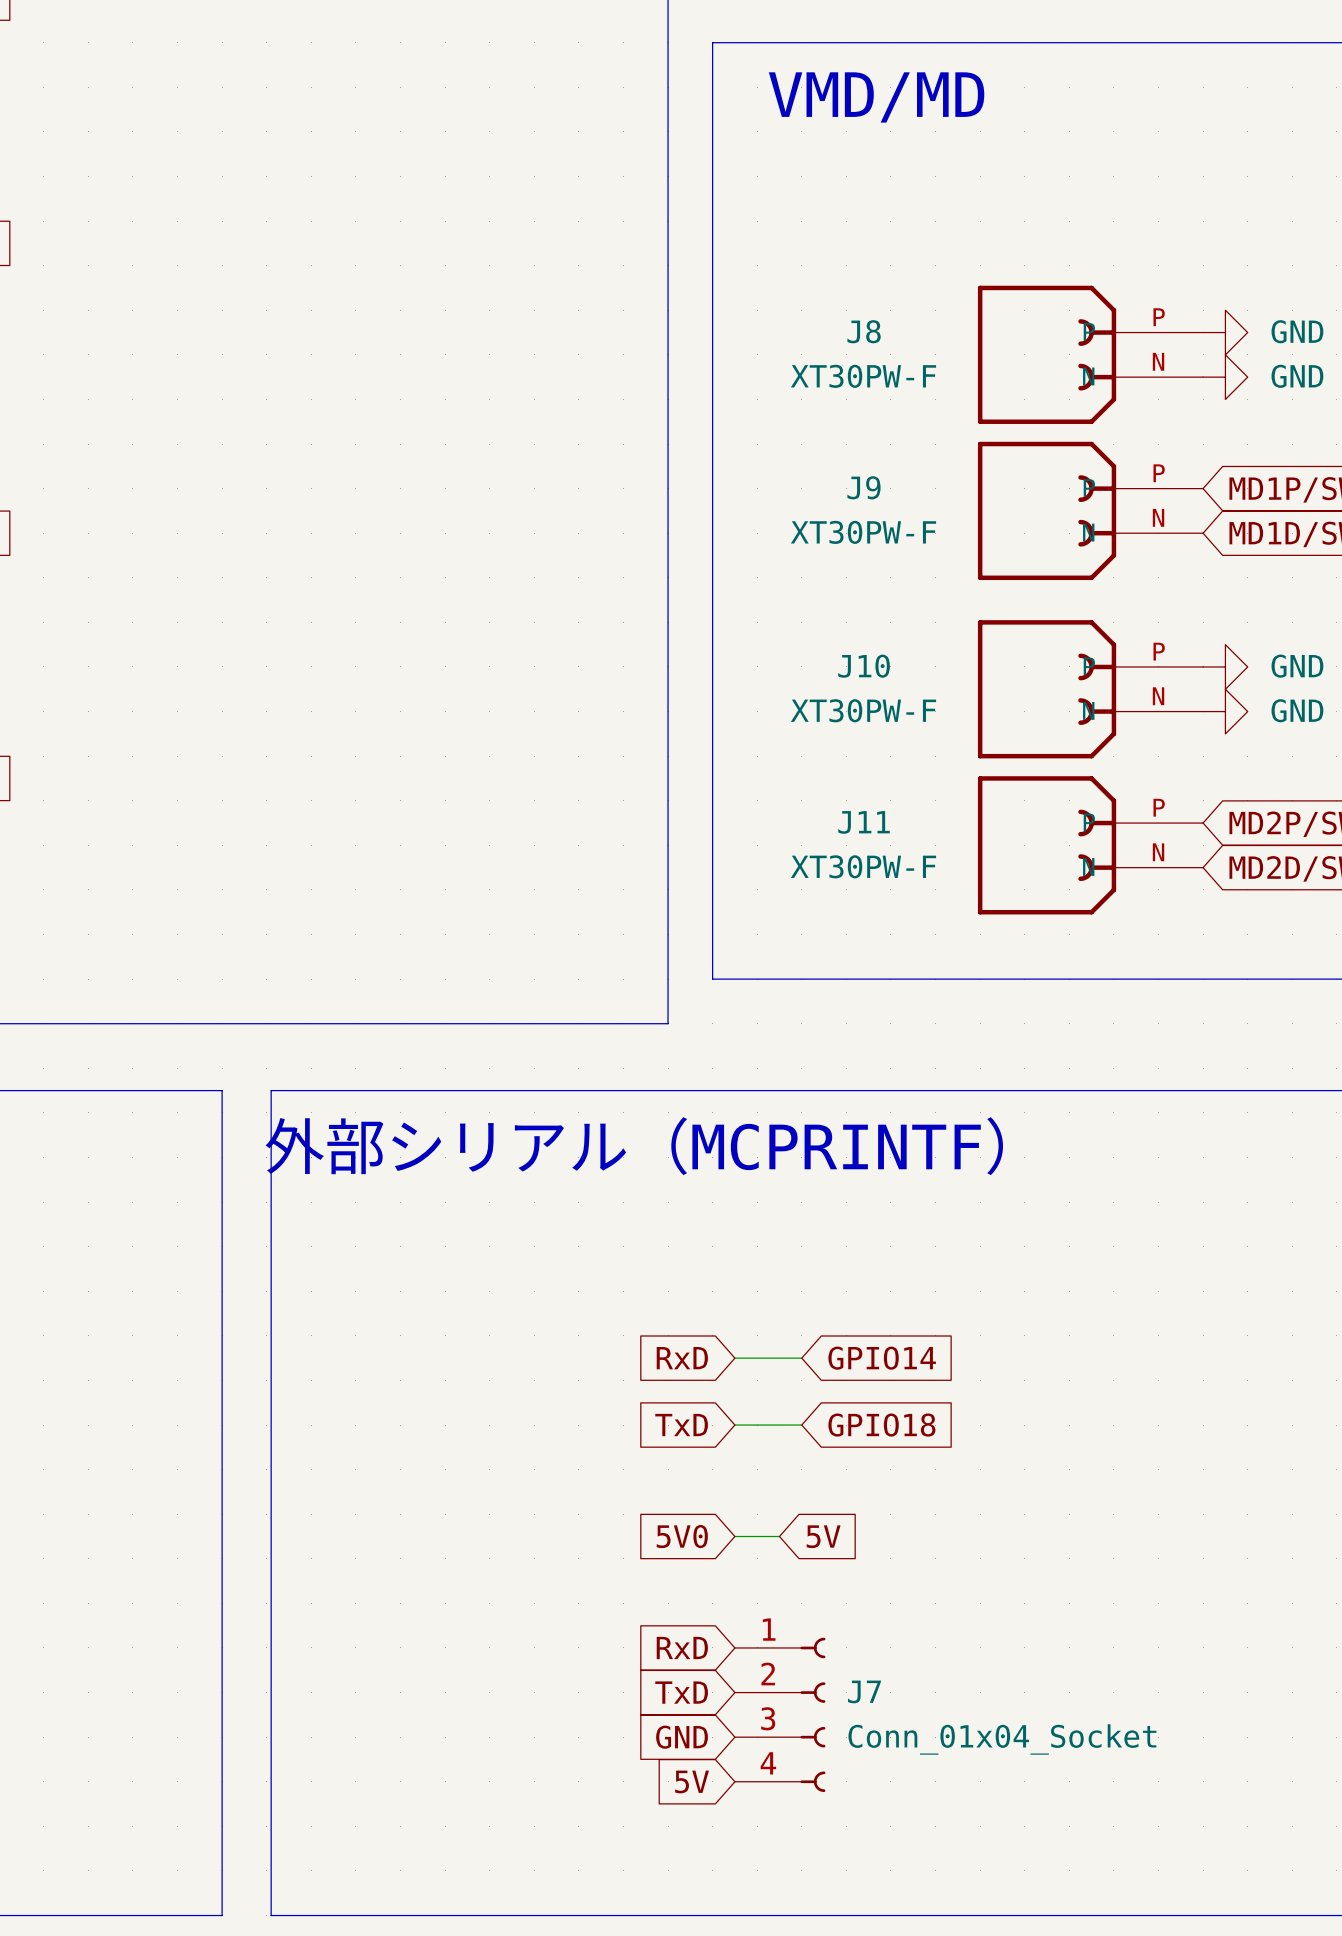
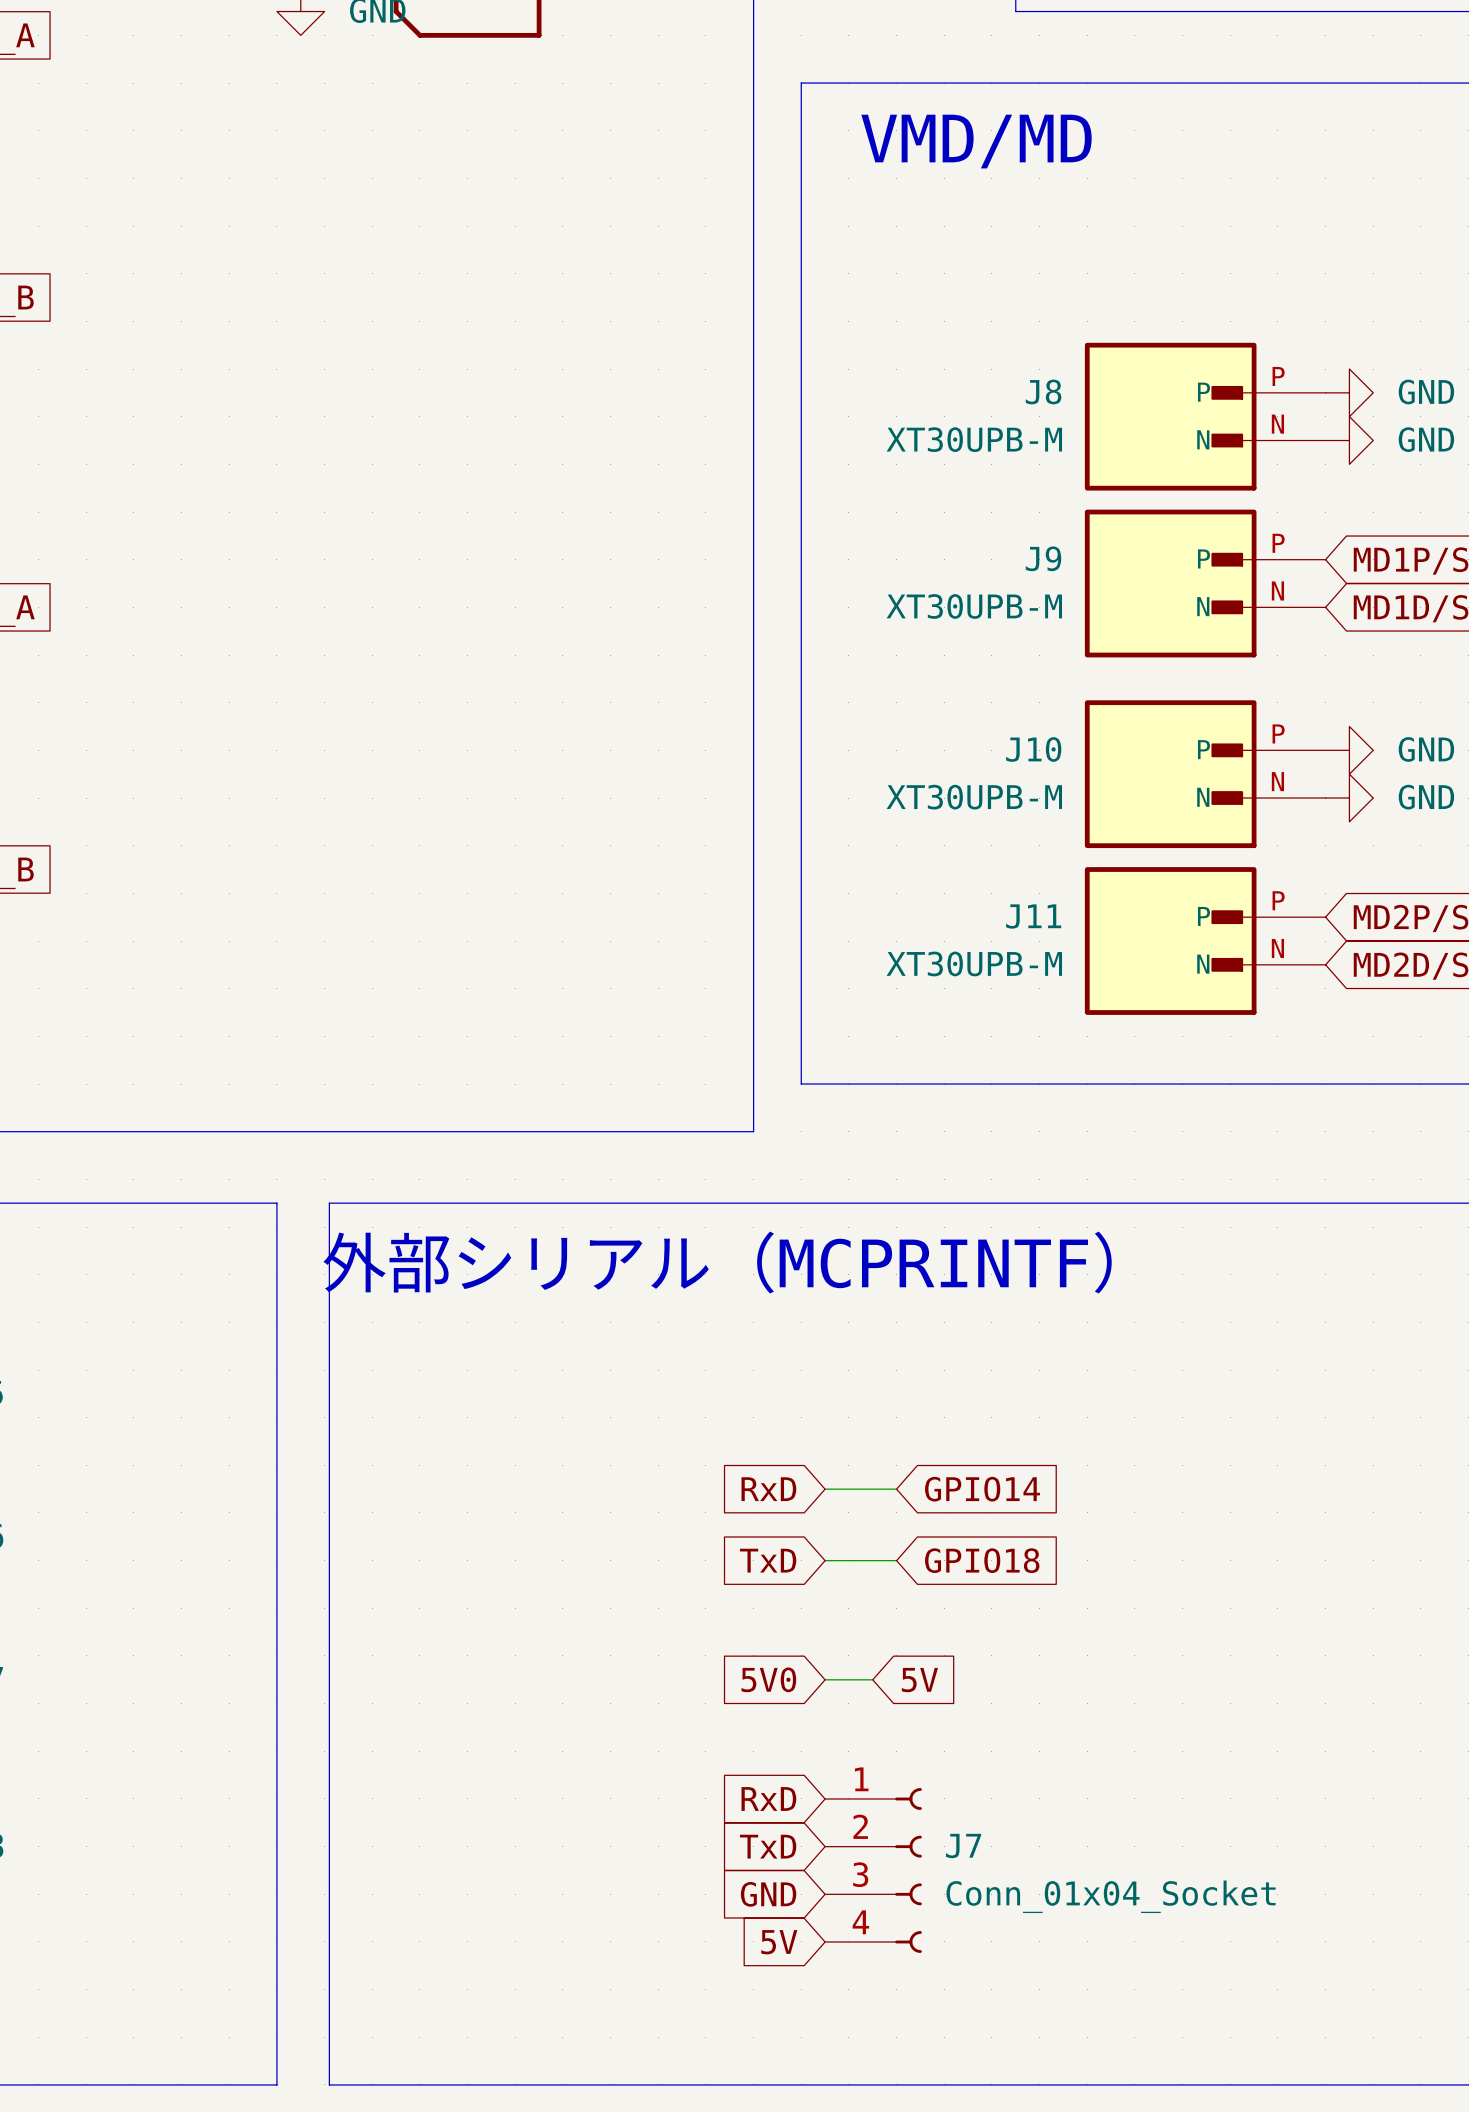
J8 symbol: [977, 285, 1204, 424] -> [1084, 342, 1326, 491]
J8 name position: J8 (864, 331) -> J8 (1043, 391)
J8 value: XT30PW-F (863, 376) -> XT30UPB-M (974, 439)
J9 symbol: [977, 441, 1204, 581] -> [1084, 509, 1326, 658]
J9 name position: J9 (864, 487) -> J9 (1043, 558)
J9 value: XT30PW-F (863, 532) -> XT30UPB-M (974, 606)
J10 symbol: [977, 620, 1204, 759] -> [1084, 700, 1326, 849]
J10 name position: J10 (864, 666) -> J10 (1033, 749)
J10 value: XT30PW-F (863, 710) -> XT30UPB-M (974, 797)
J11 symbol: [977, 776, 1204, 915] -> [1084, 867, 1326, 1015]
J11 name position: J11 (864, 822) -> J11 (1033, 916)
J11 value: XT30PW-F (863, 866) -> XT30UPB-M (974, 963)

